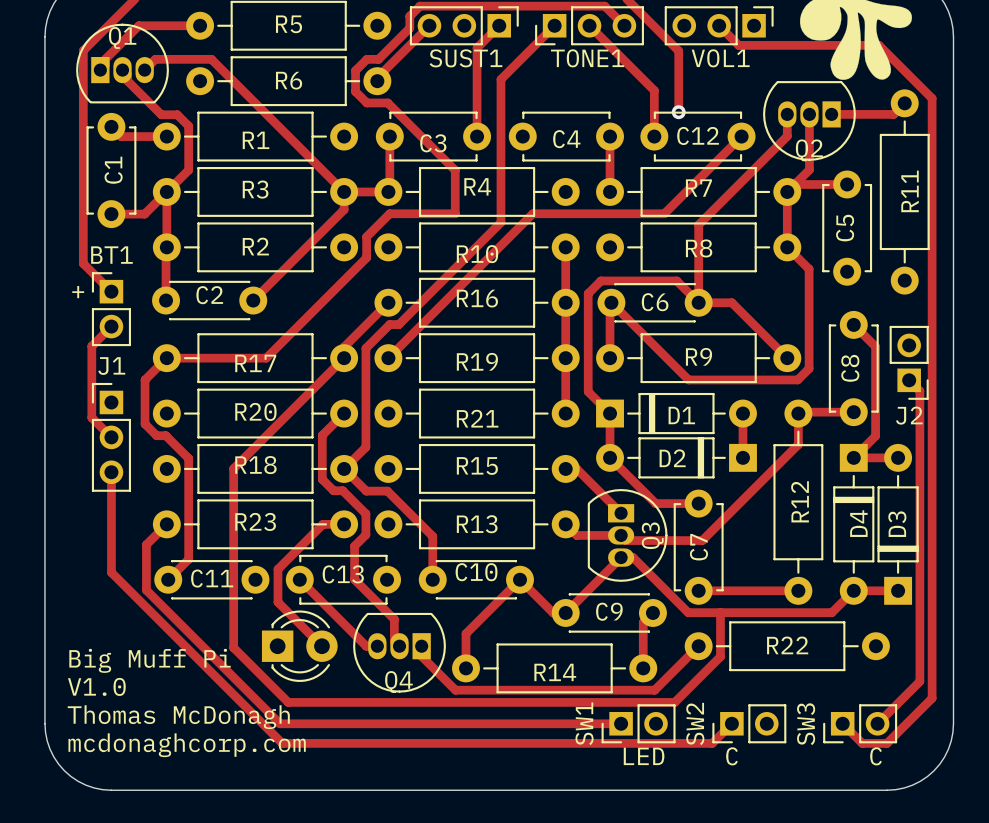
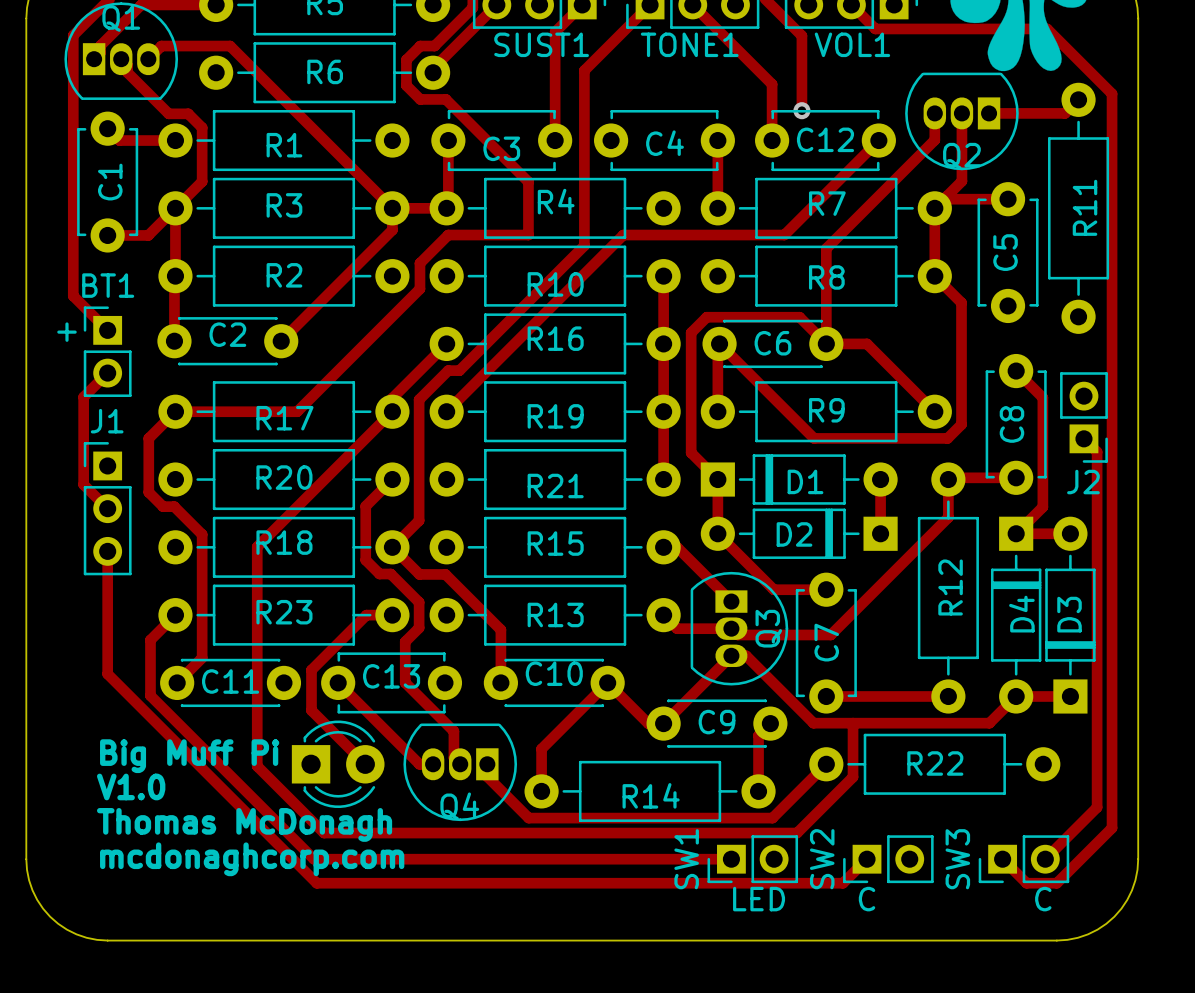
text position: Big Muff Pi (150, 660) -> Big Muff Pi (189, 756)
text position: V1.0 (96, 686) -> V1.0 (131, 786)
text position: Thomas McDonagh (178, 717) -> Thomas McDonagh (244, 824)
text position: mcdonaghcorp.com (187, 745) -> mcdonaghcorp.com (252, 859)

